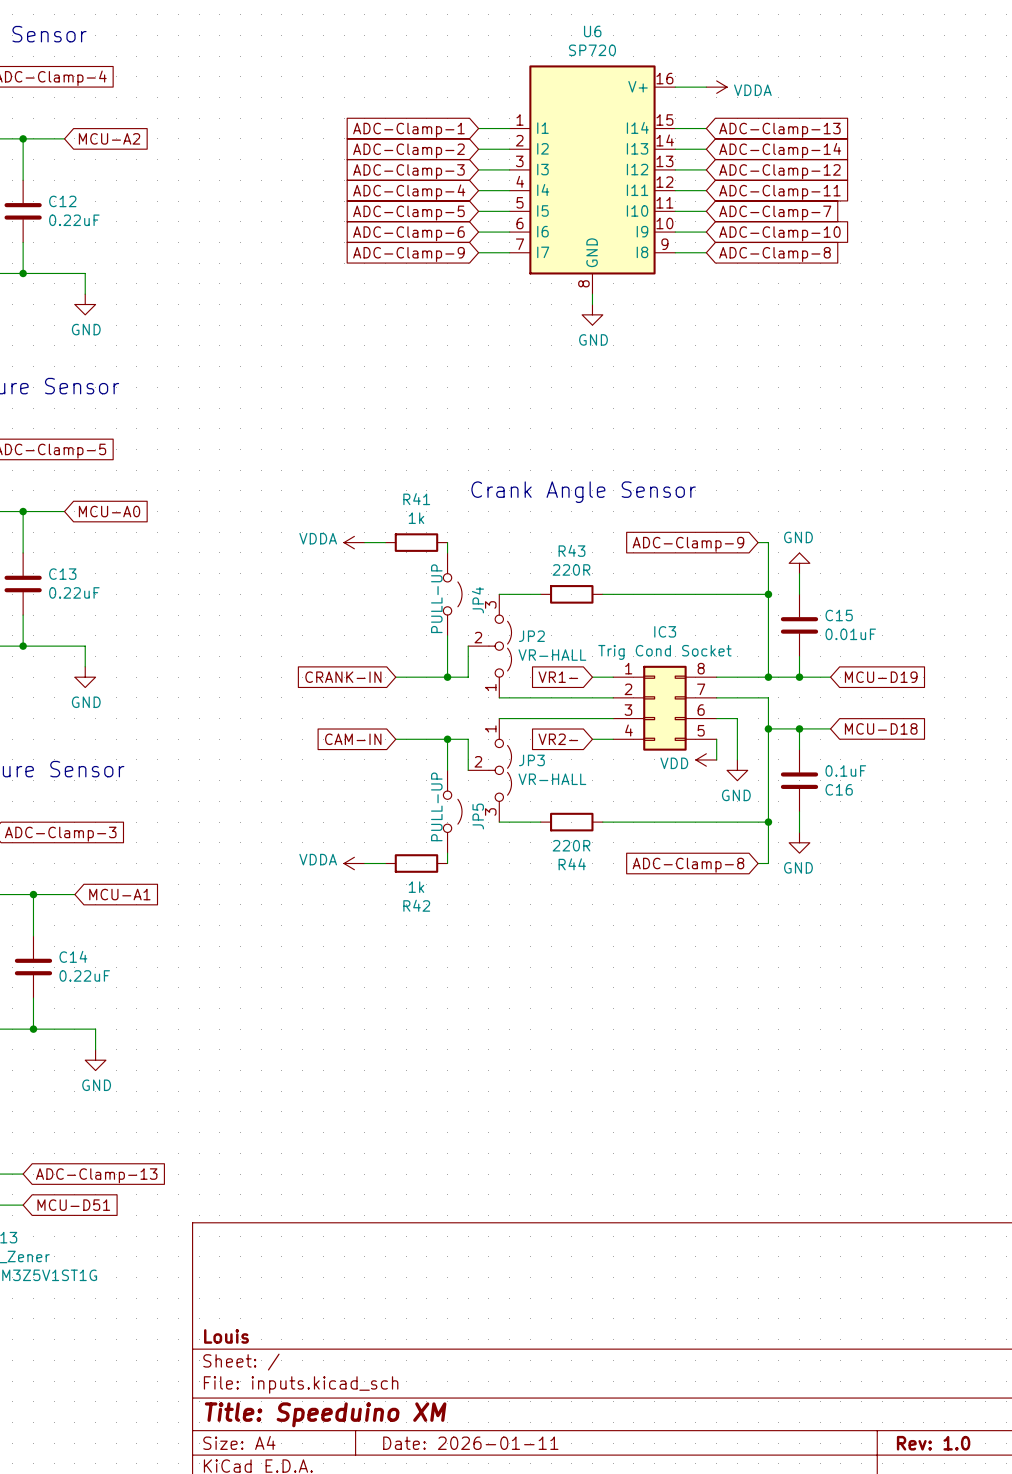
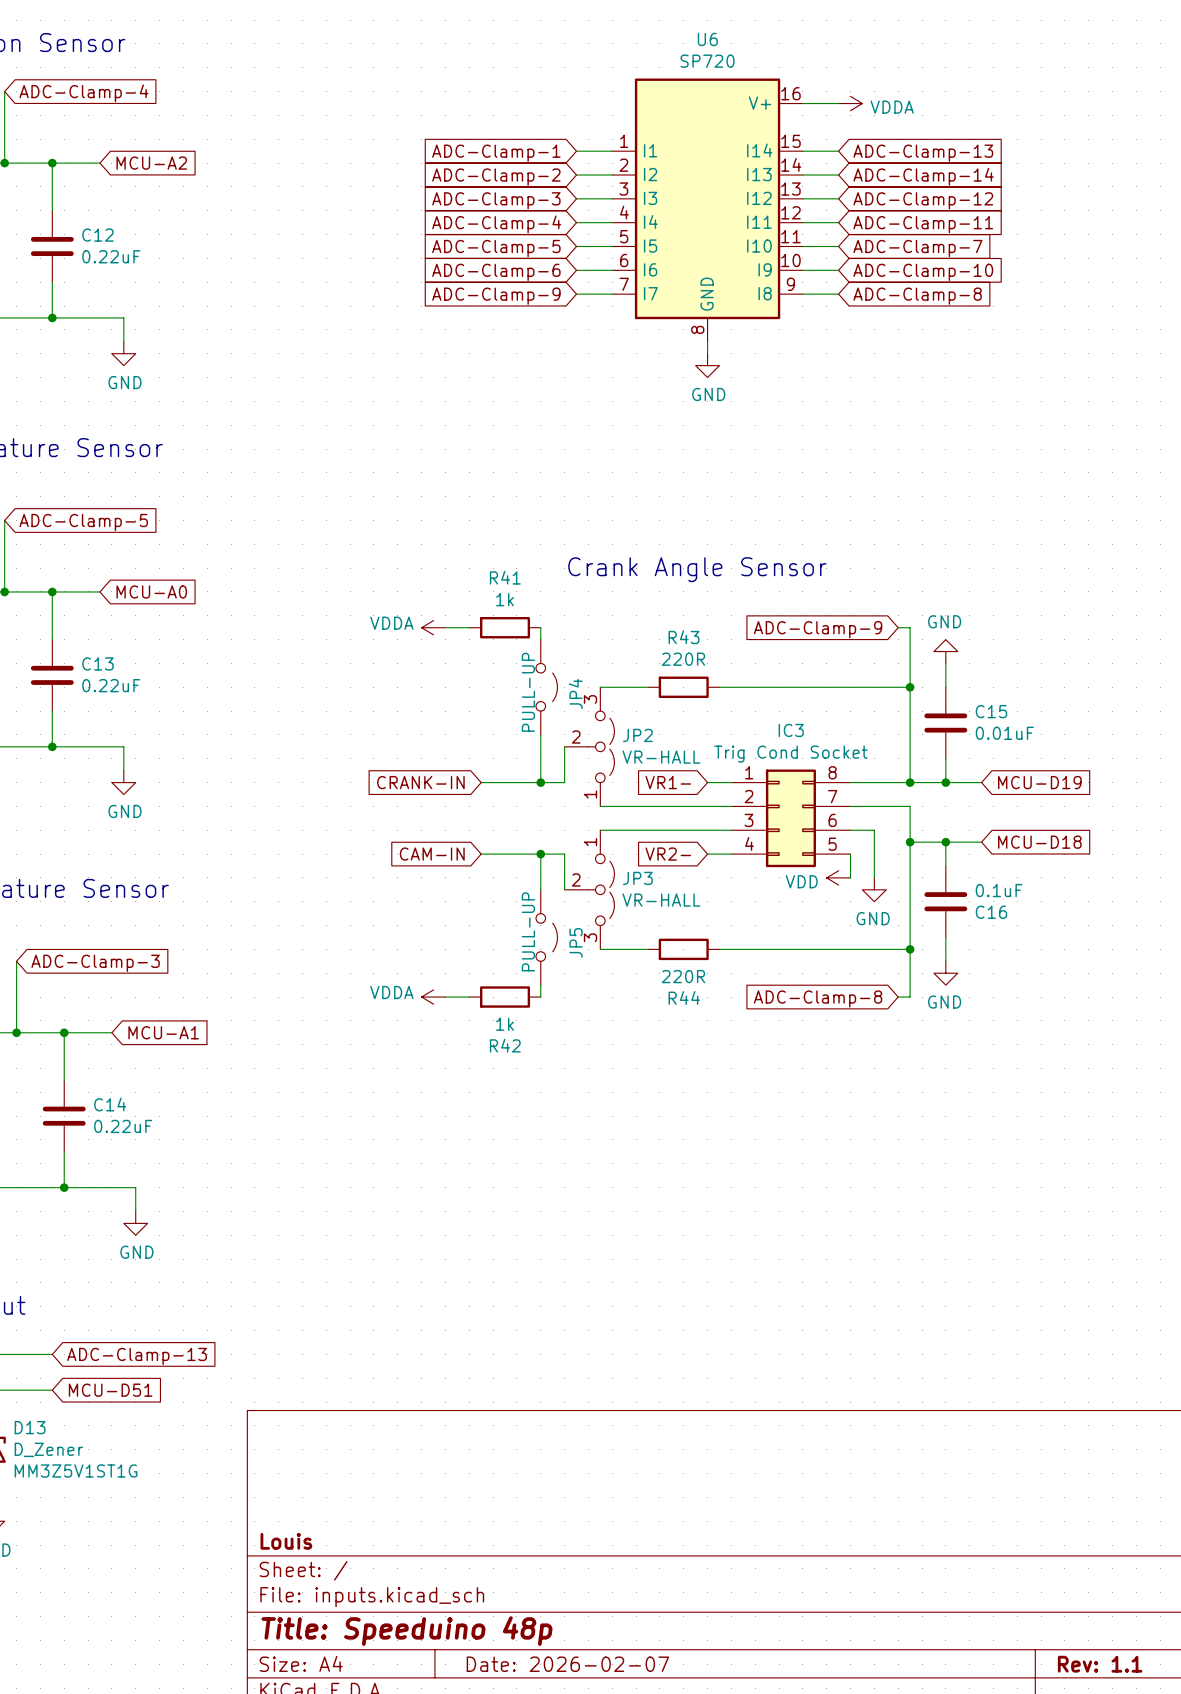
title block: Title: Speeduino XM (325, 1414) -> Title: Speeduino 48p (406, 1631)
title block: Date: 2026-01-11 (470, 1443) -> Date: 2026-02-07 (567, 1664)
title block: Rev: 1.0 (933, 1443) -> Rev: 1.1 (1100, 1664)

